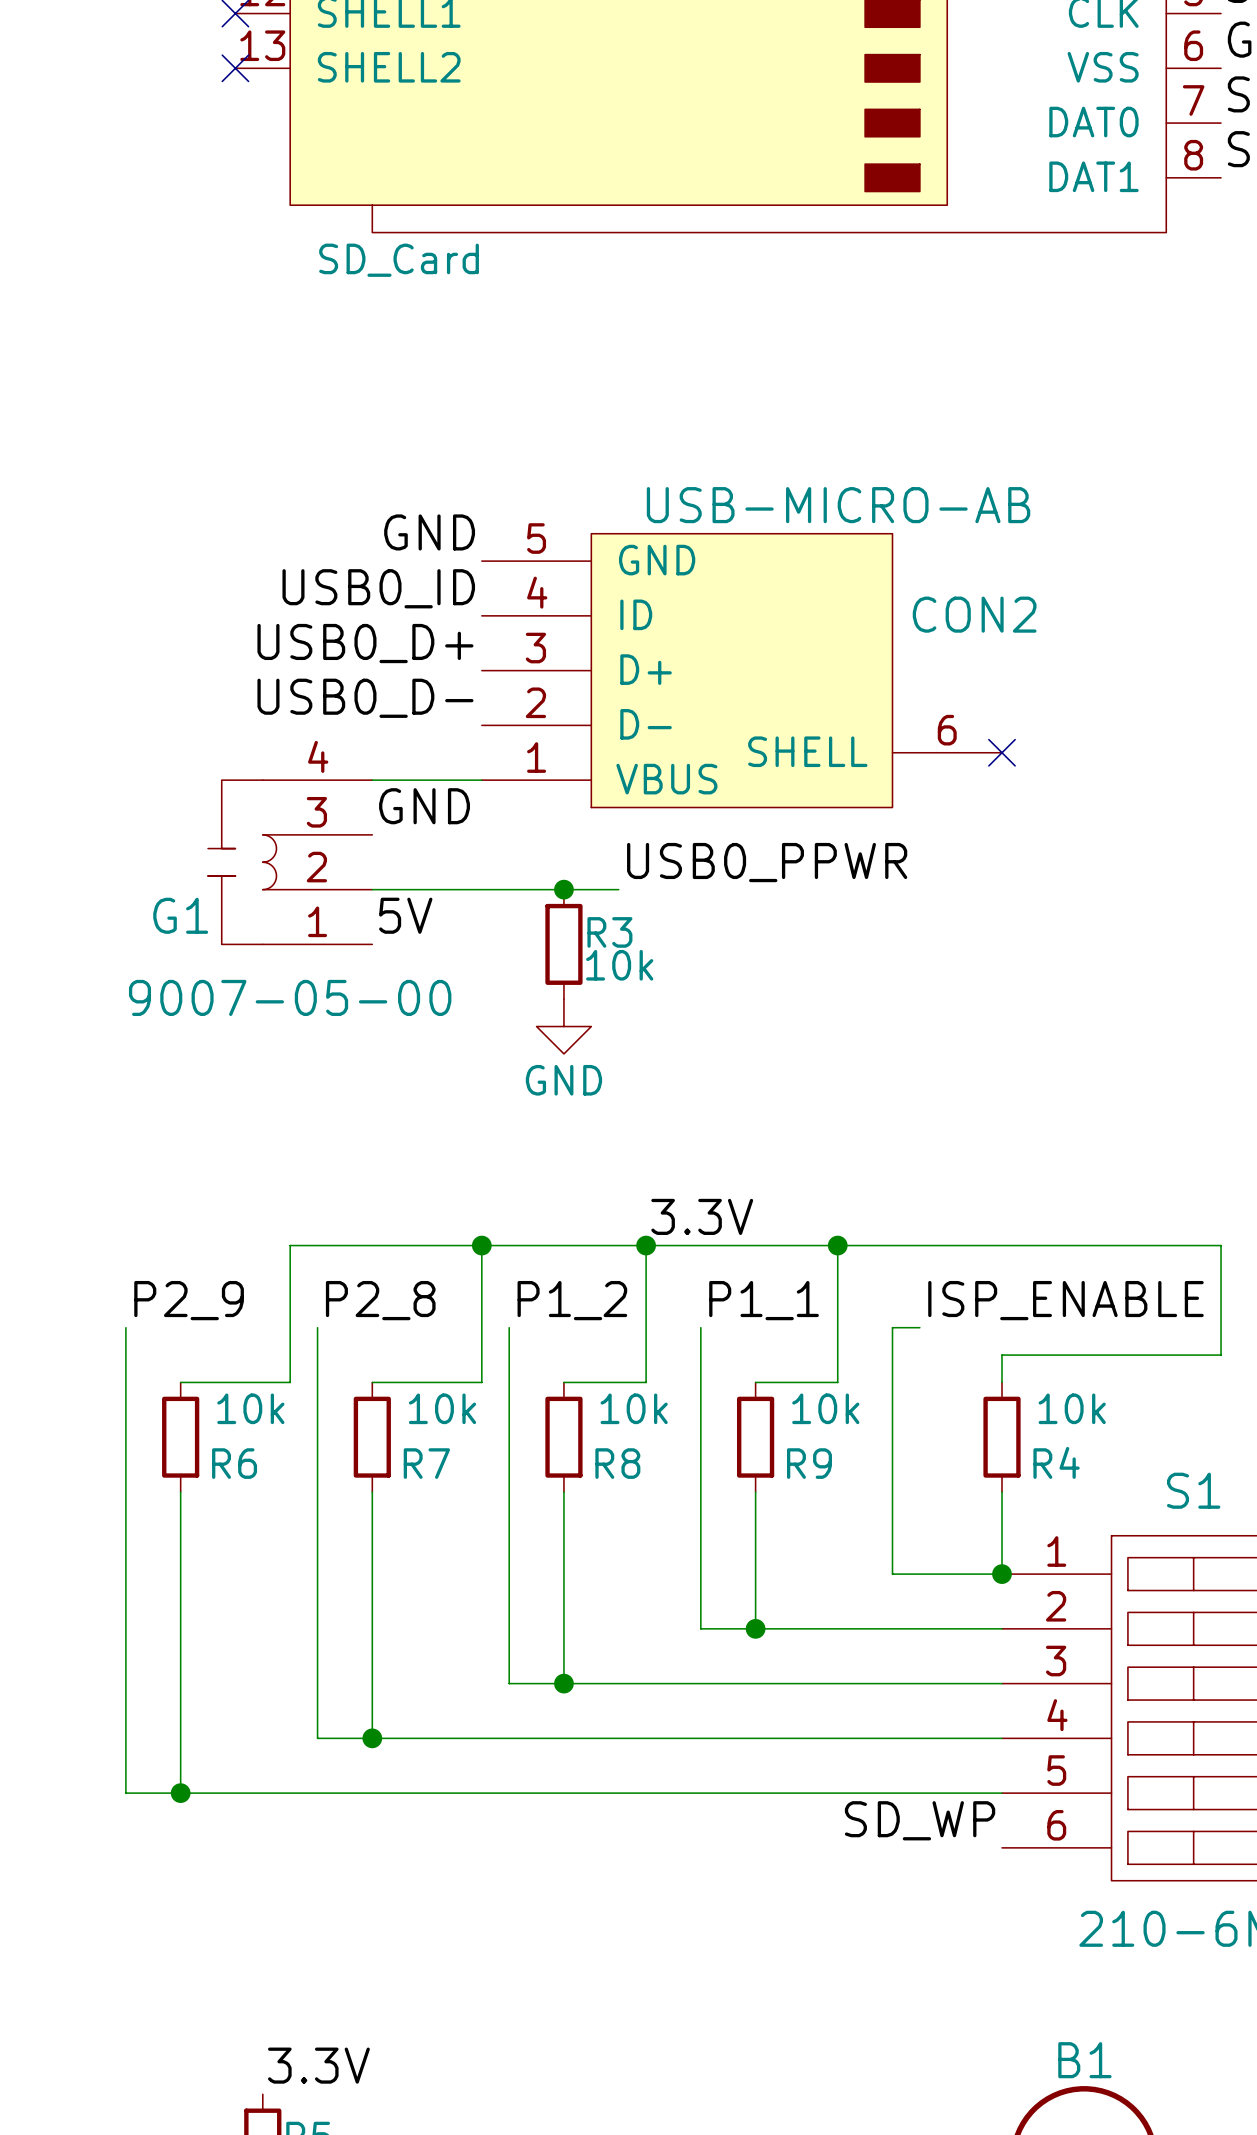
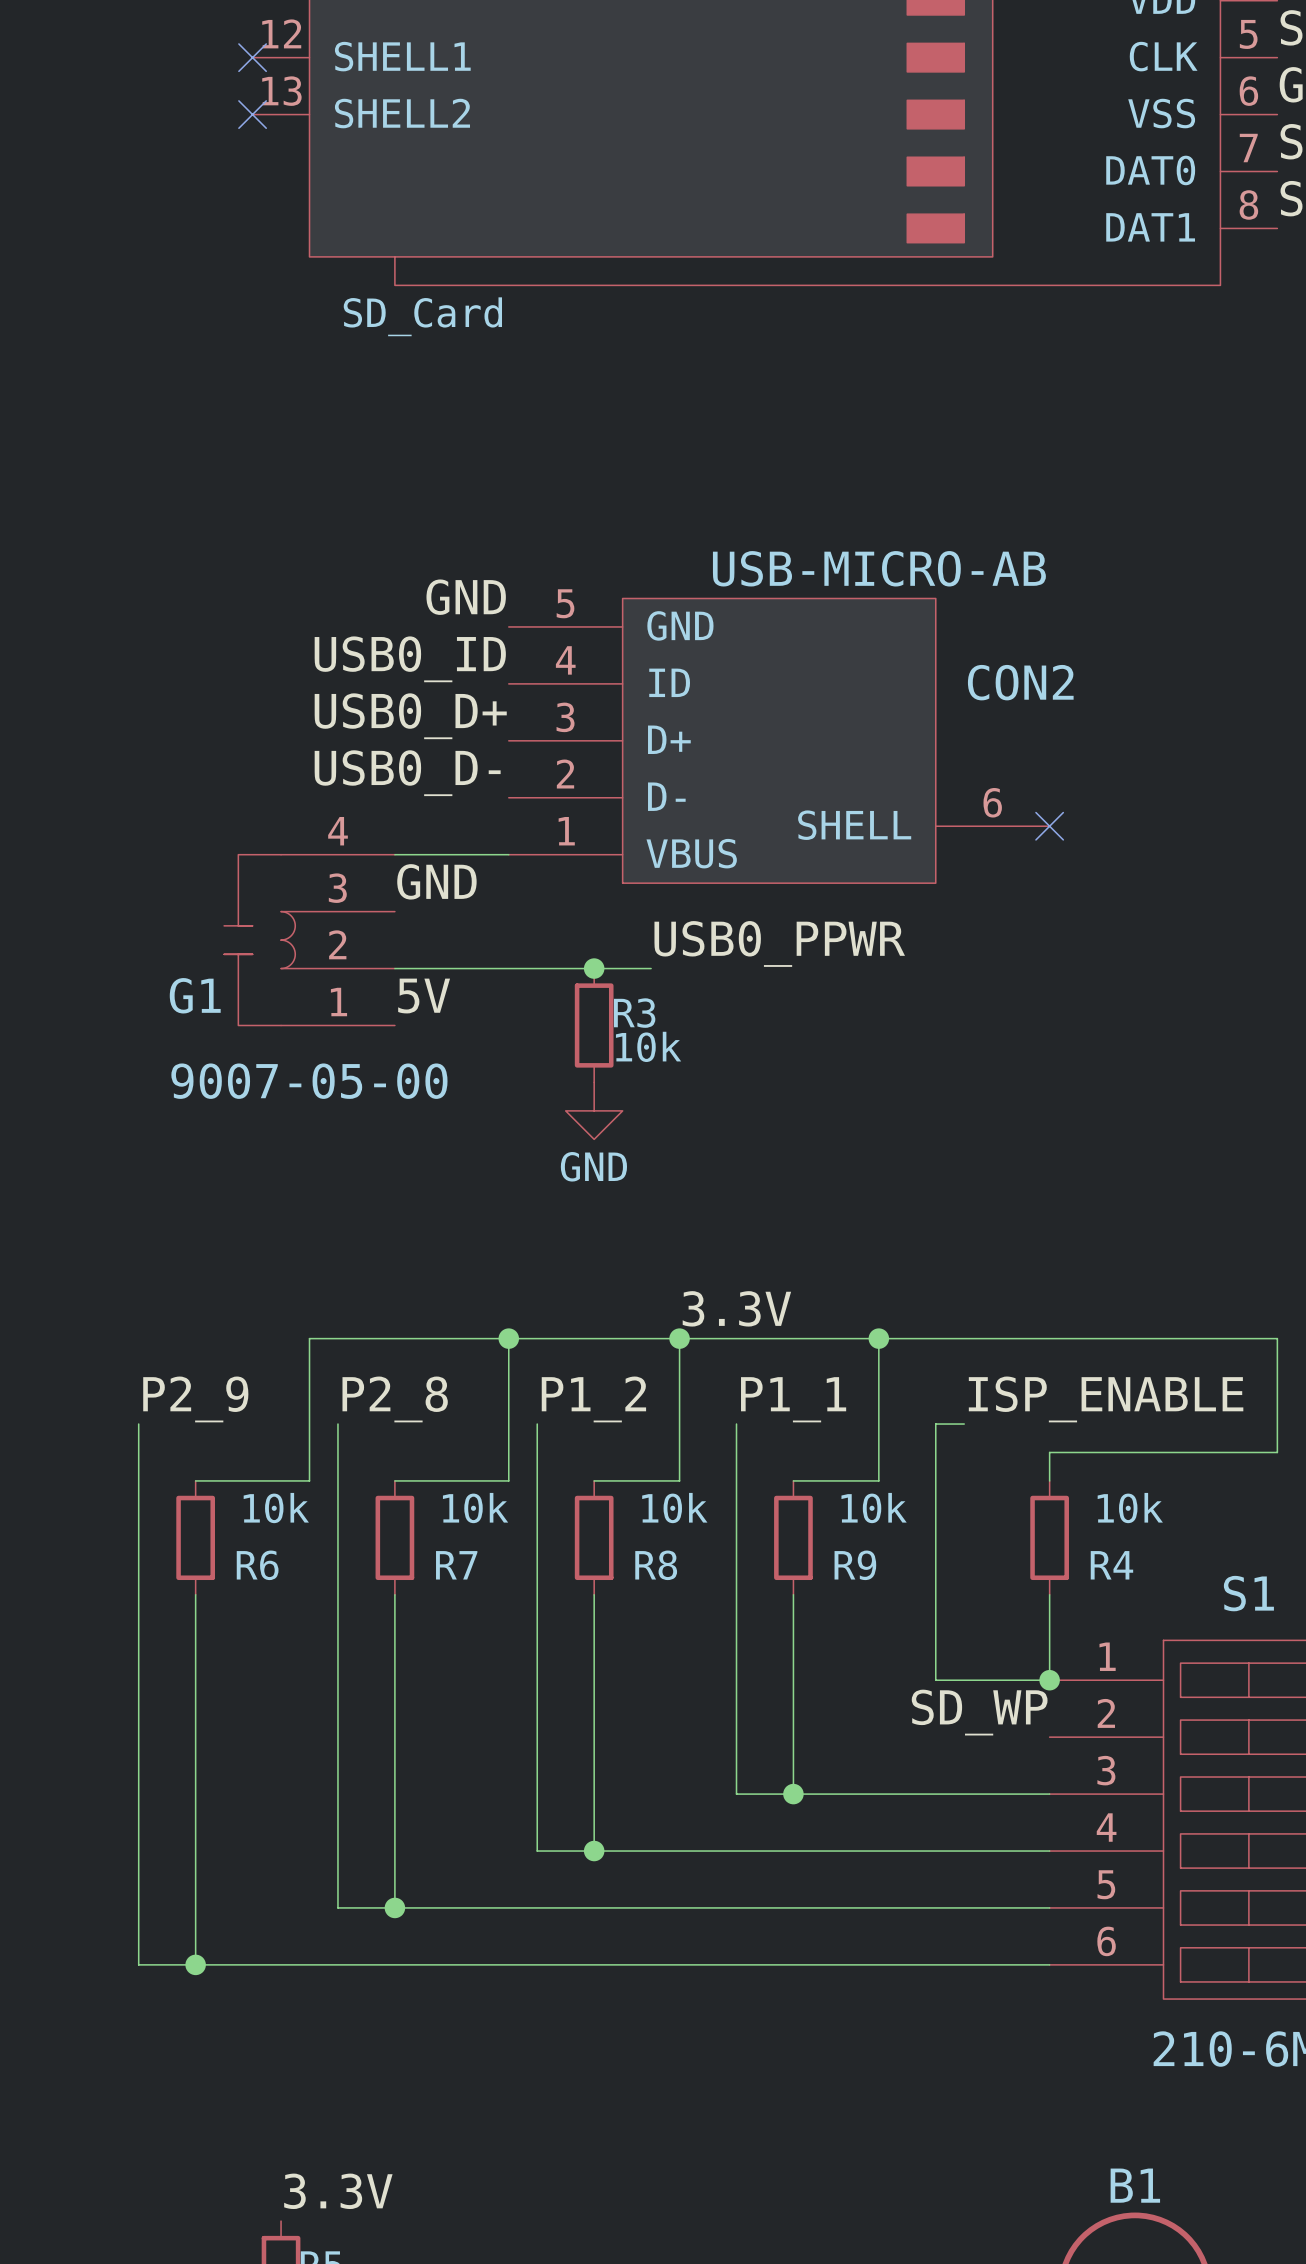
wire: (700, 1628) (1002, 1628) -> (736, 1737) (736, 1794)
wire: none -> (793, 1737) (793, 1794)
junction position: (755, 1628) -> (793, 1794)
wire: (509, 1683) (700, 1683) -> (537, 1794) (537, 1851)
wire: none -> (594, 1794) (594, 1851)
junction position: (563, 1683) -> (594, 1851)
wire: (317, 1738) (509, 1738) -> (337, 1851) (337, 1907)
wire: none -> (394, 1851) (394, 1907)
junction position: (372, 1738) -> (394, 1907)
wire: (125, 1793) (317, 1793) -> (138, 1907) (138, 1964) (1049, 1964)
wire: none -> (195, 1907) (195, 1964)
junction position: (180, 1793) -> (195, 1964)
label position: SD_WP (920, 1820) -> SD_WP (979, 1712)

